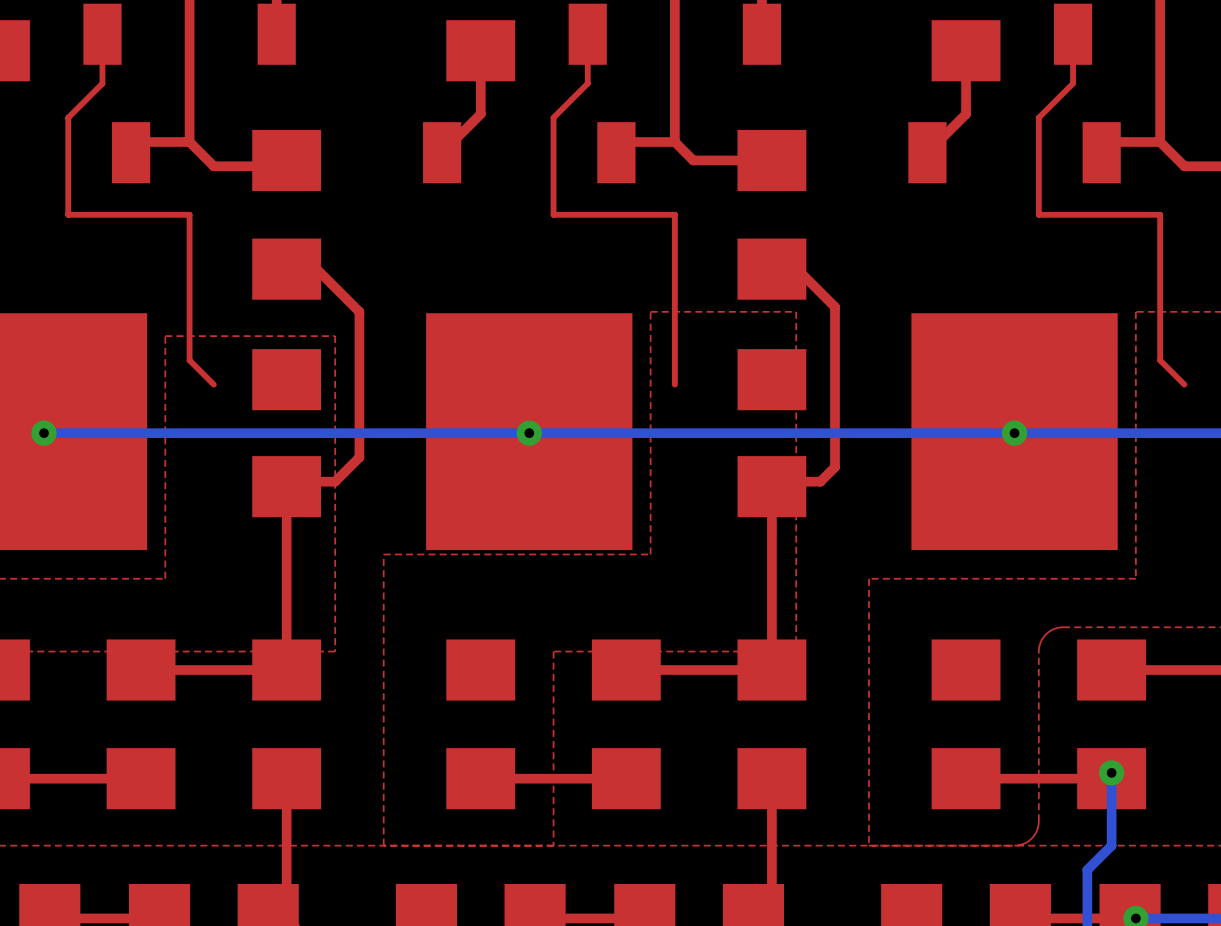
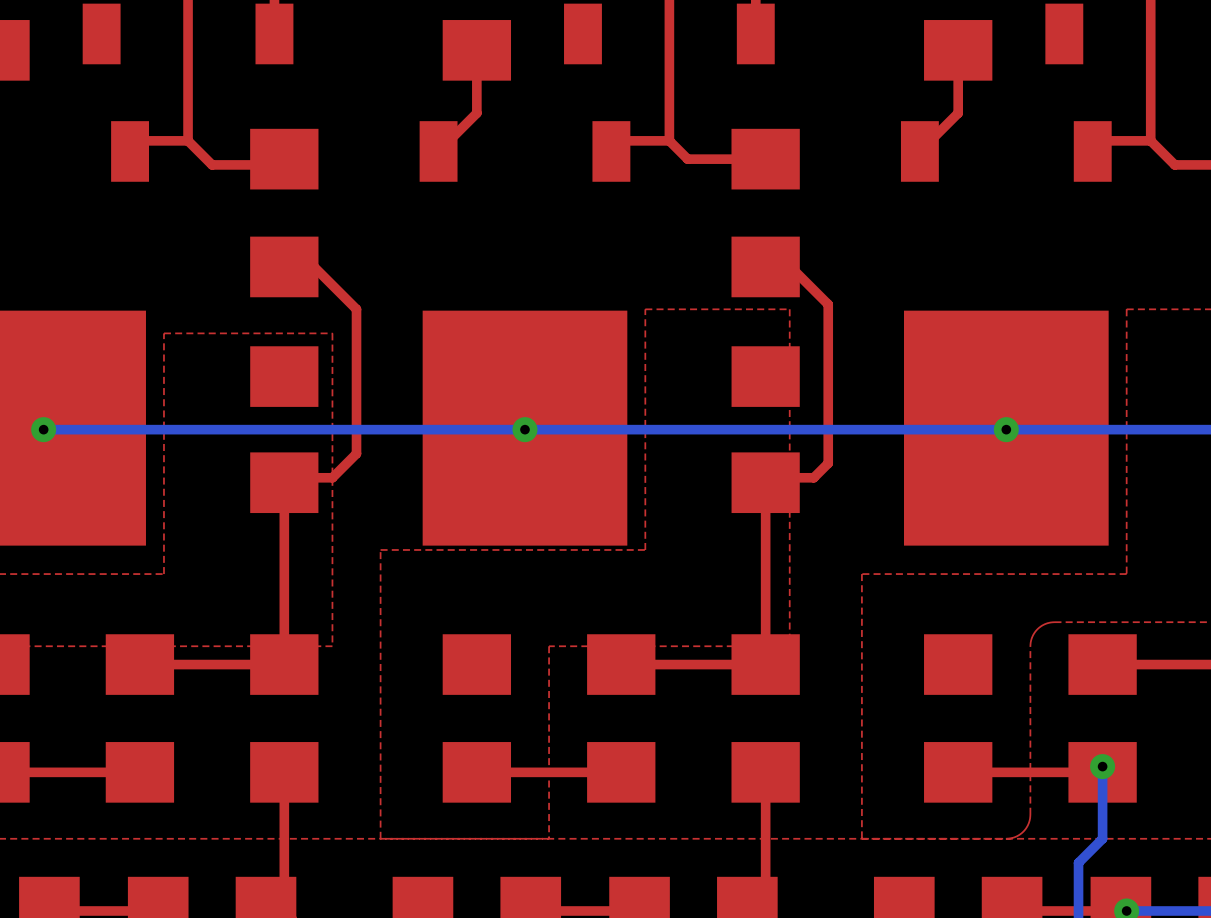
top track: (102, 34) (102, 83) (68, 117) (68, 214) (189, 214) (189, 360) (213, 384) -> none
top track: (587, 34) (587, 83) (553, 117) (553, 214) (674, 214) (674, 384) -> none
top track: (1073, 34) (1073, 83) (1038, 117) (1038, 214) (1160, 214) (1160, 360) (1184, 384) -> none

